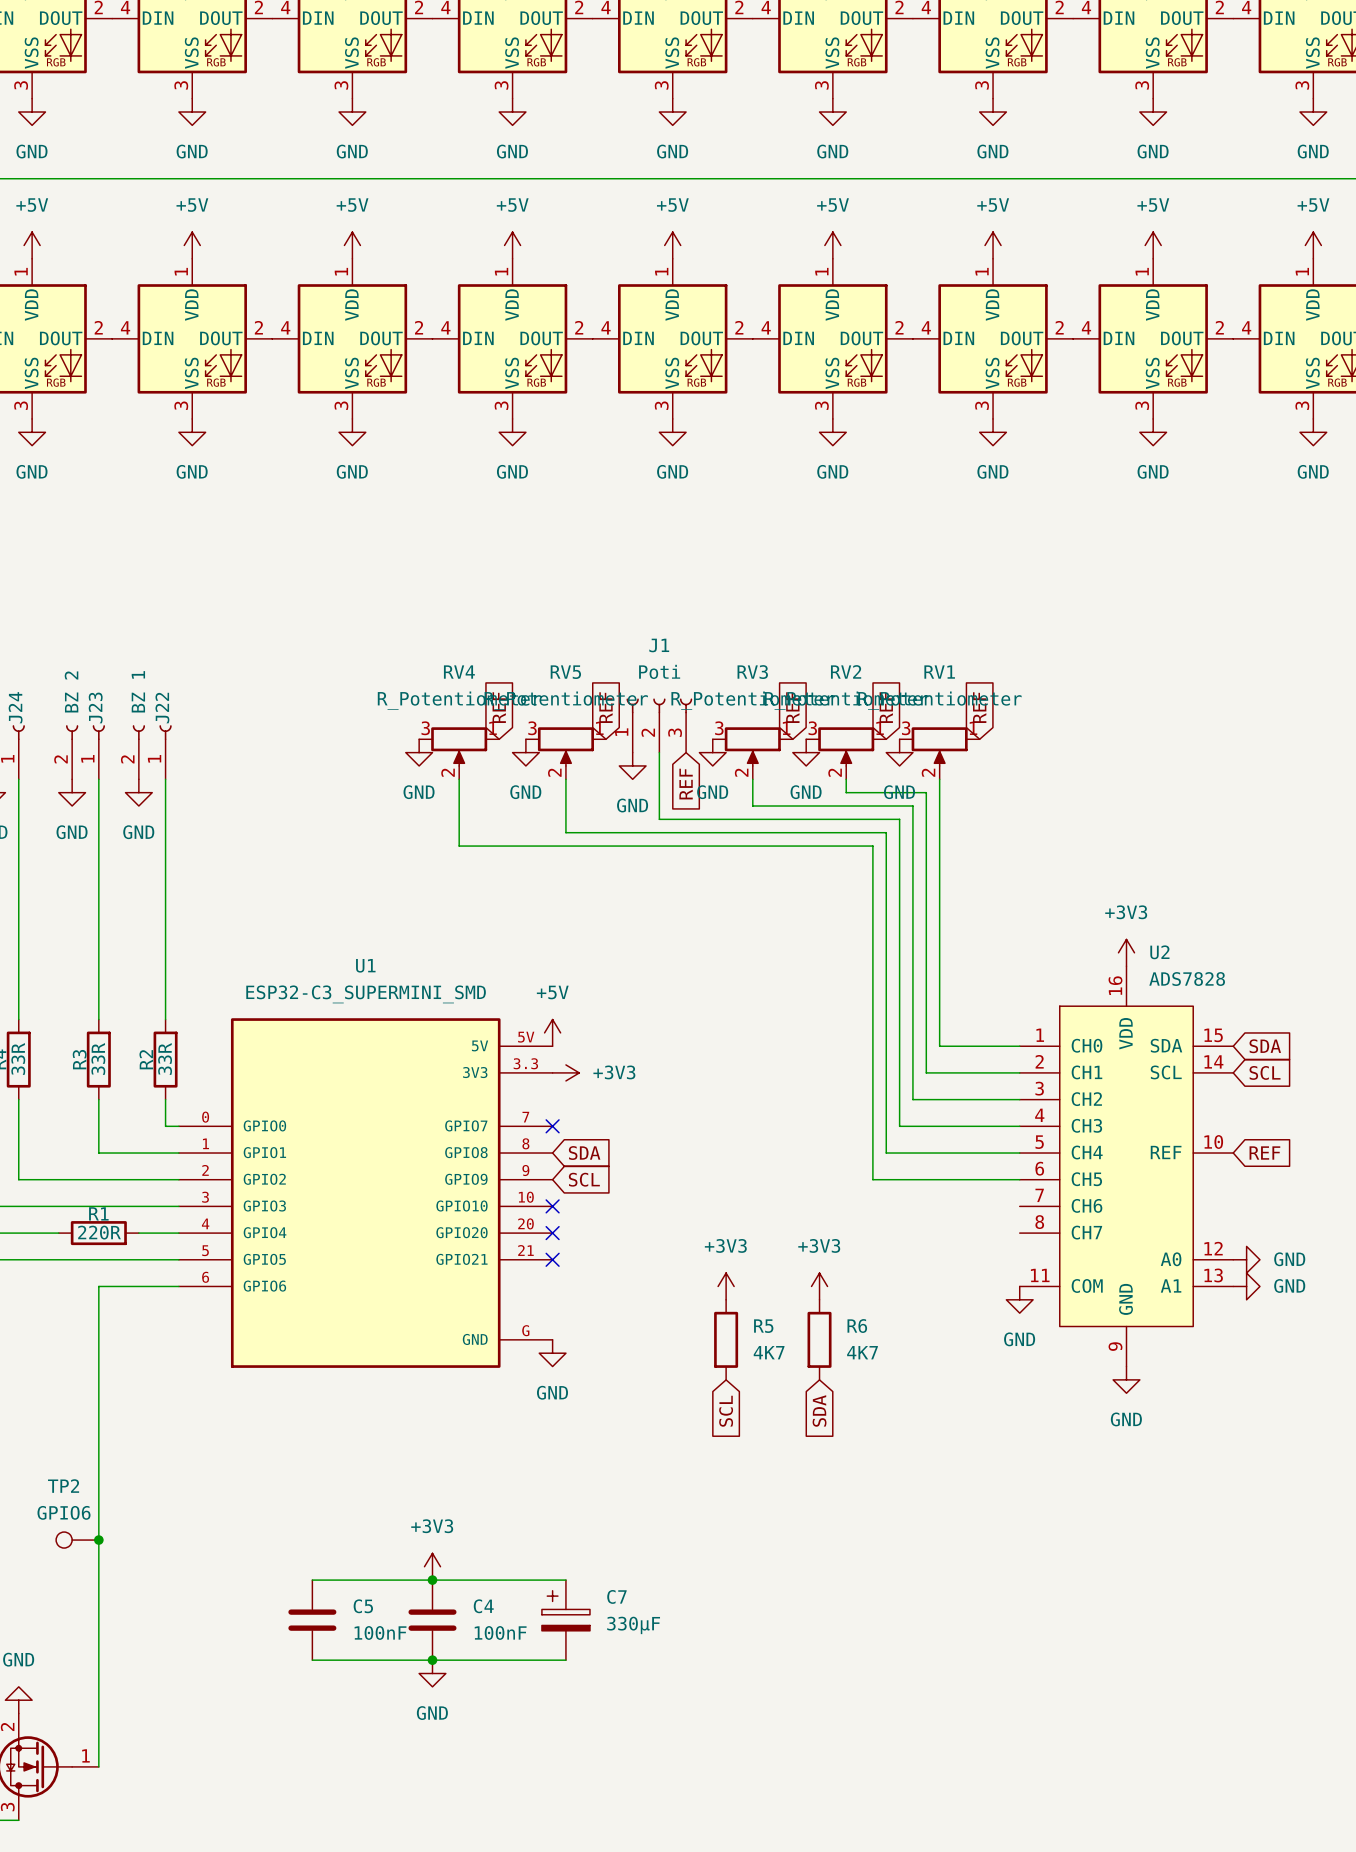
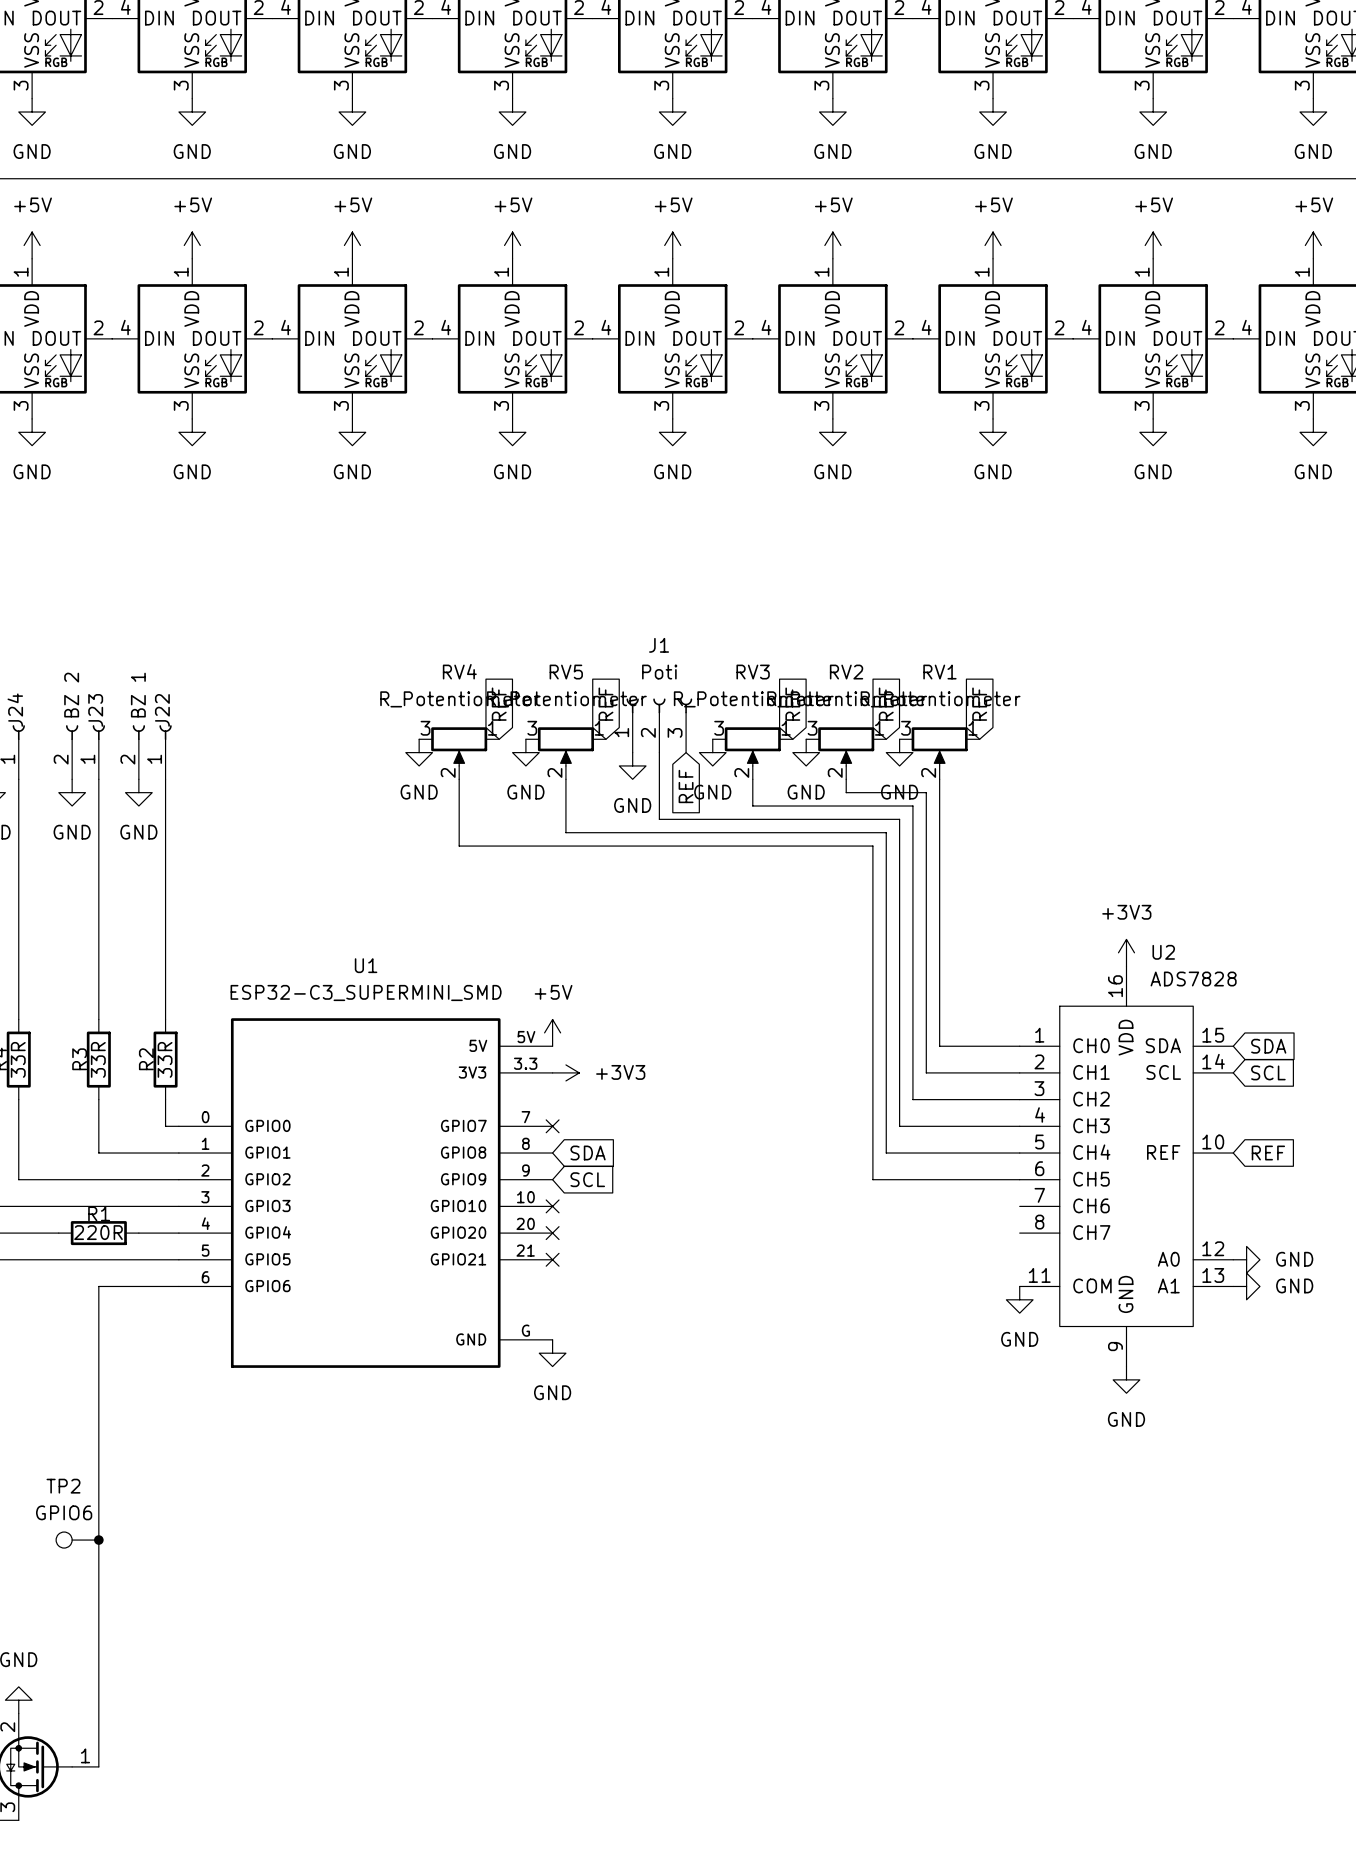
power symbol: +3V3 (726, 1286) -> none
power symbol: +3V3 (819, 1286) -> none
R5: 4K7 (726, 1339) -> none
R6: 4K7 (819, 1339) -> none
global label: SDA (819, 1410) -> none
global label: SCL (726, 1411) -> none
power symbol: +3V3 (432, 1566) -> none
wire: (312, 1580) (565, 1580) -> none
junction: (432, 1580) -> none
C5: 100nF (312, 1620) -> none
C4: 100nF (432, 1620) -> none
C7: 330µF (565, 1620) -> none
wire: (312, 1660) (565, 1660) -> none
junction: (432, 1660) -> none
power symbol: GND (432, 1673) -> none

